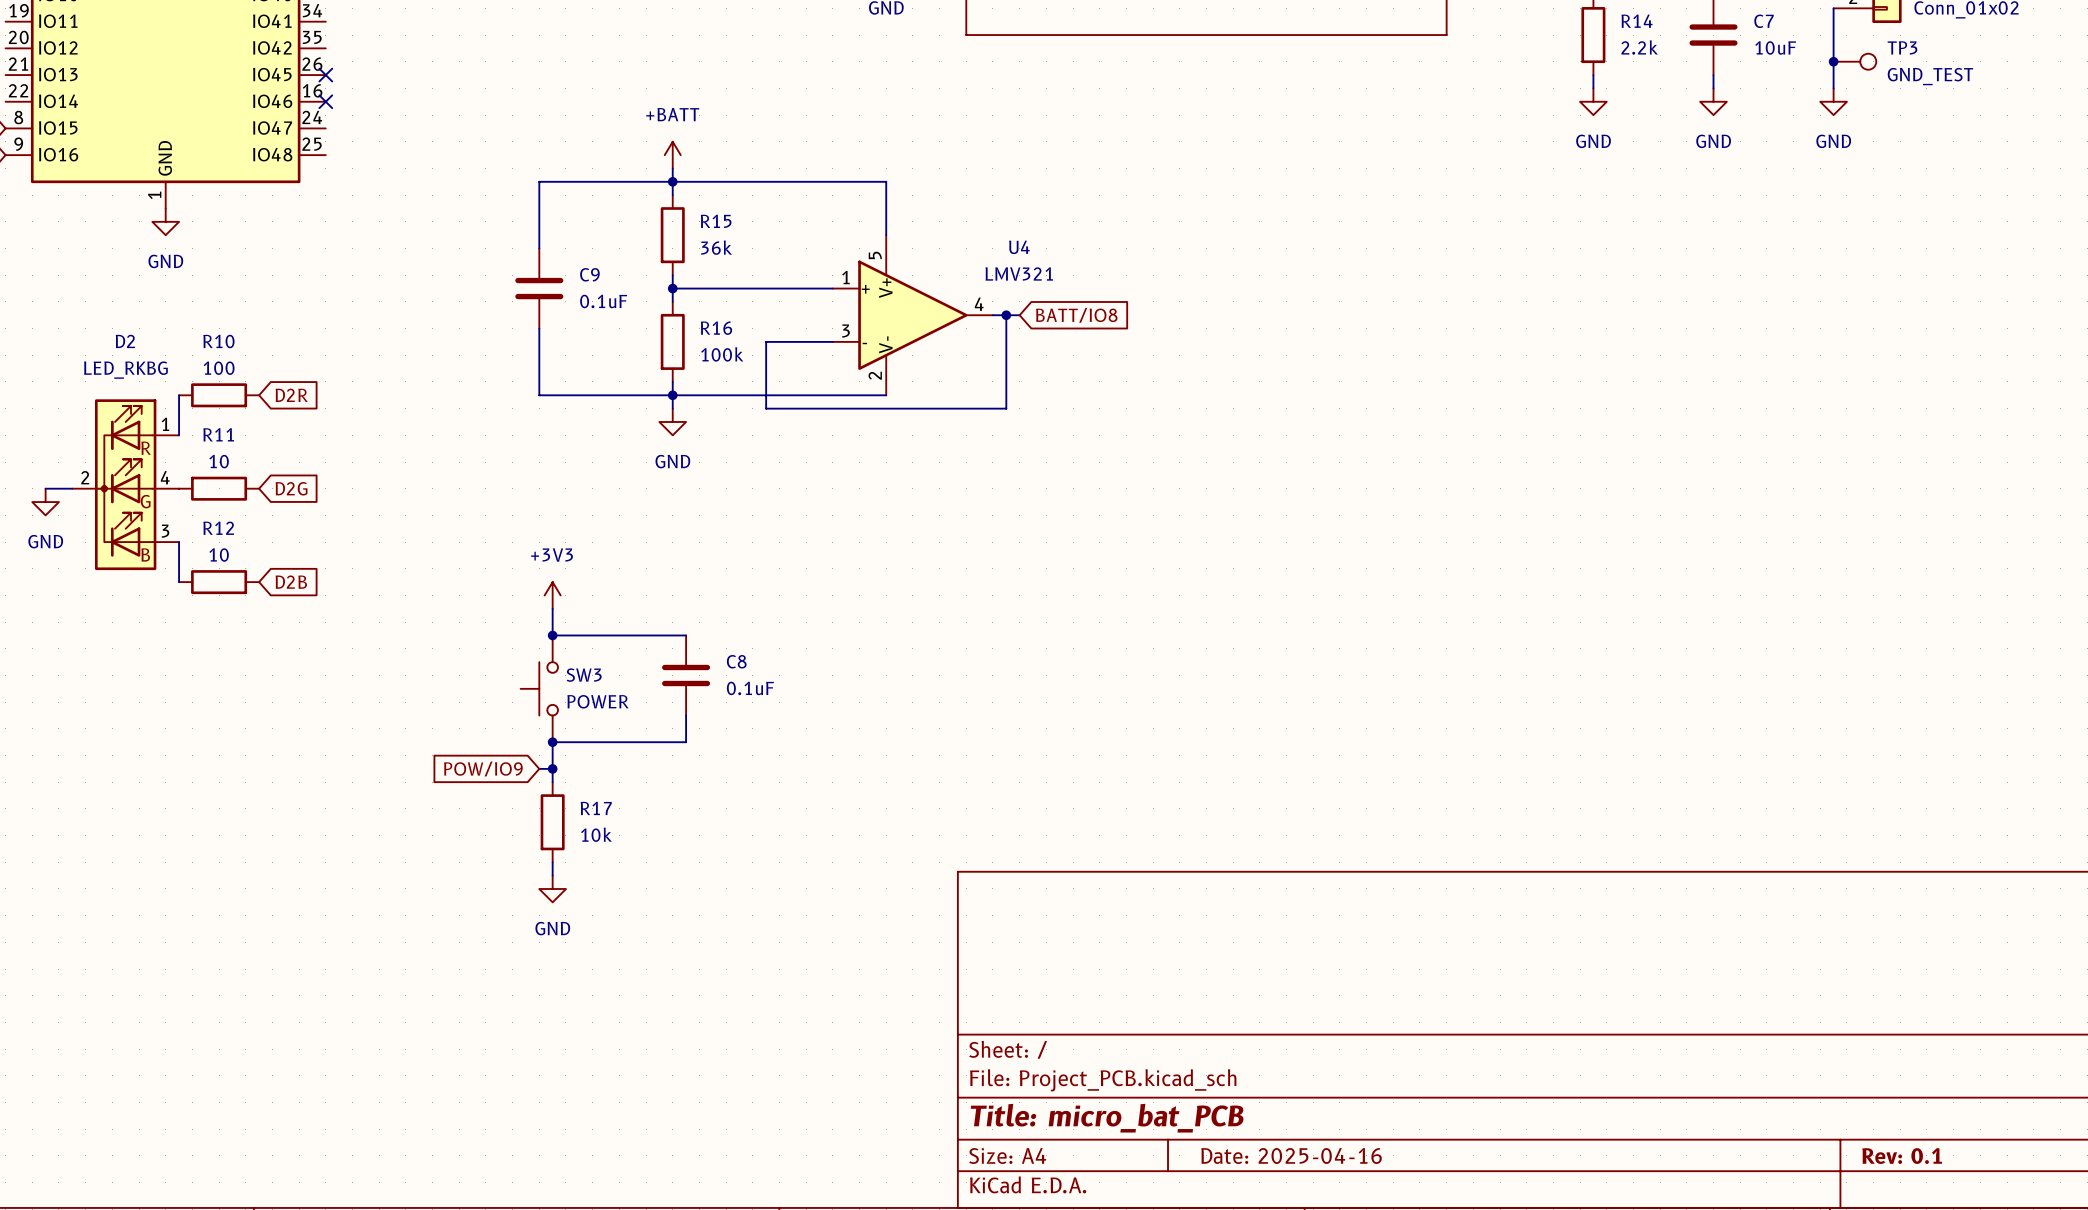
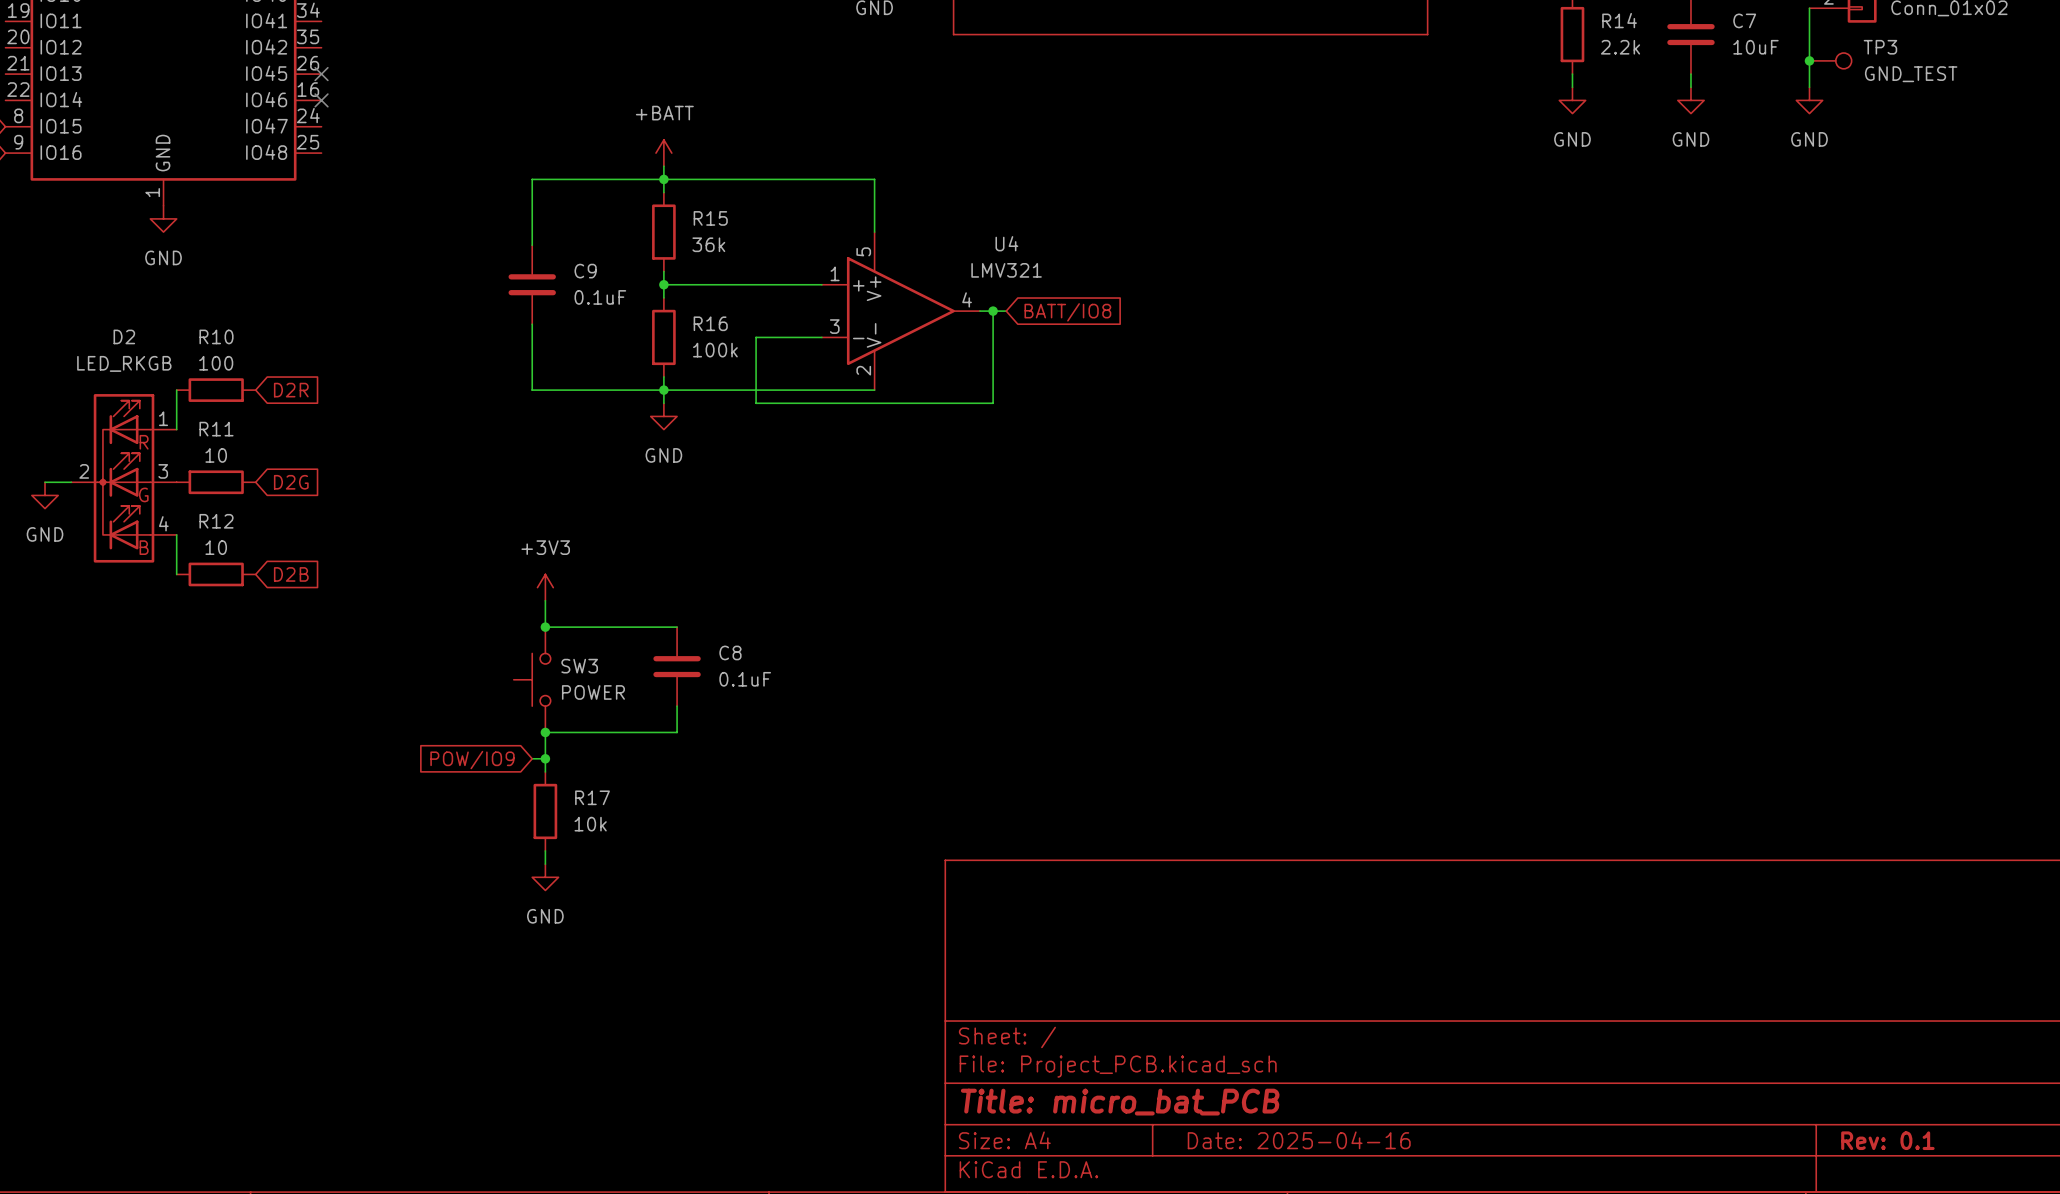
D2 value: LED_RKBG (125, 370) -> LED_RKGB (124, 363)
D2 pin number: 4 (165, 477) -> 3 (163, 471)
D2 pin number: 3 (165, 531) -> 4 (163, 523)

